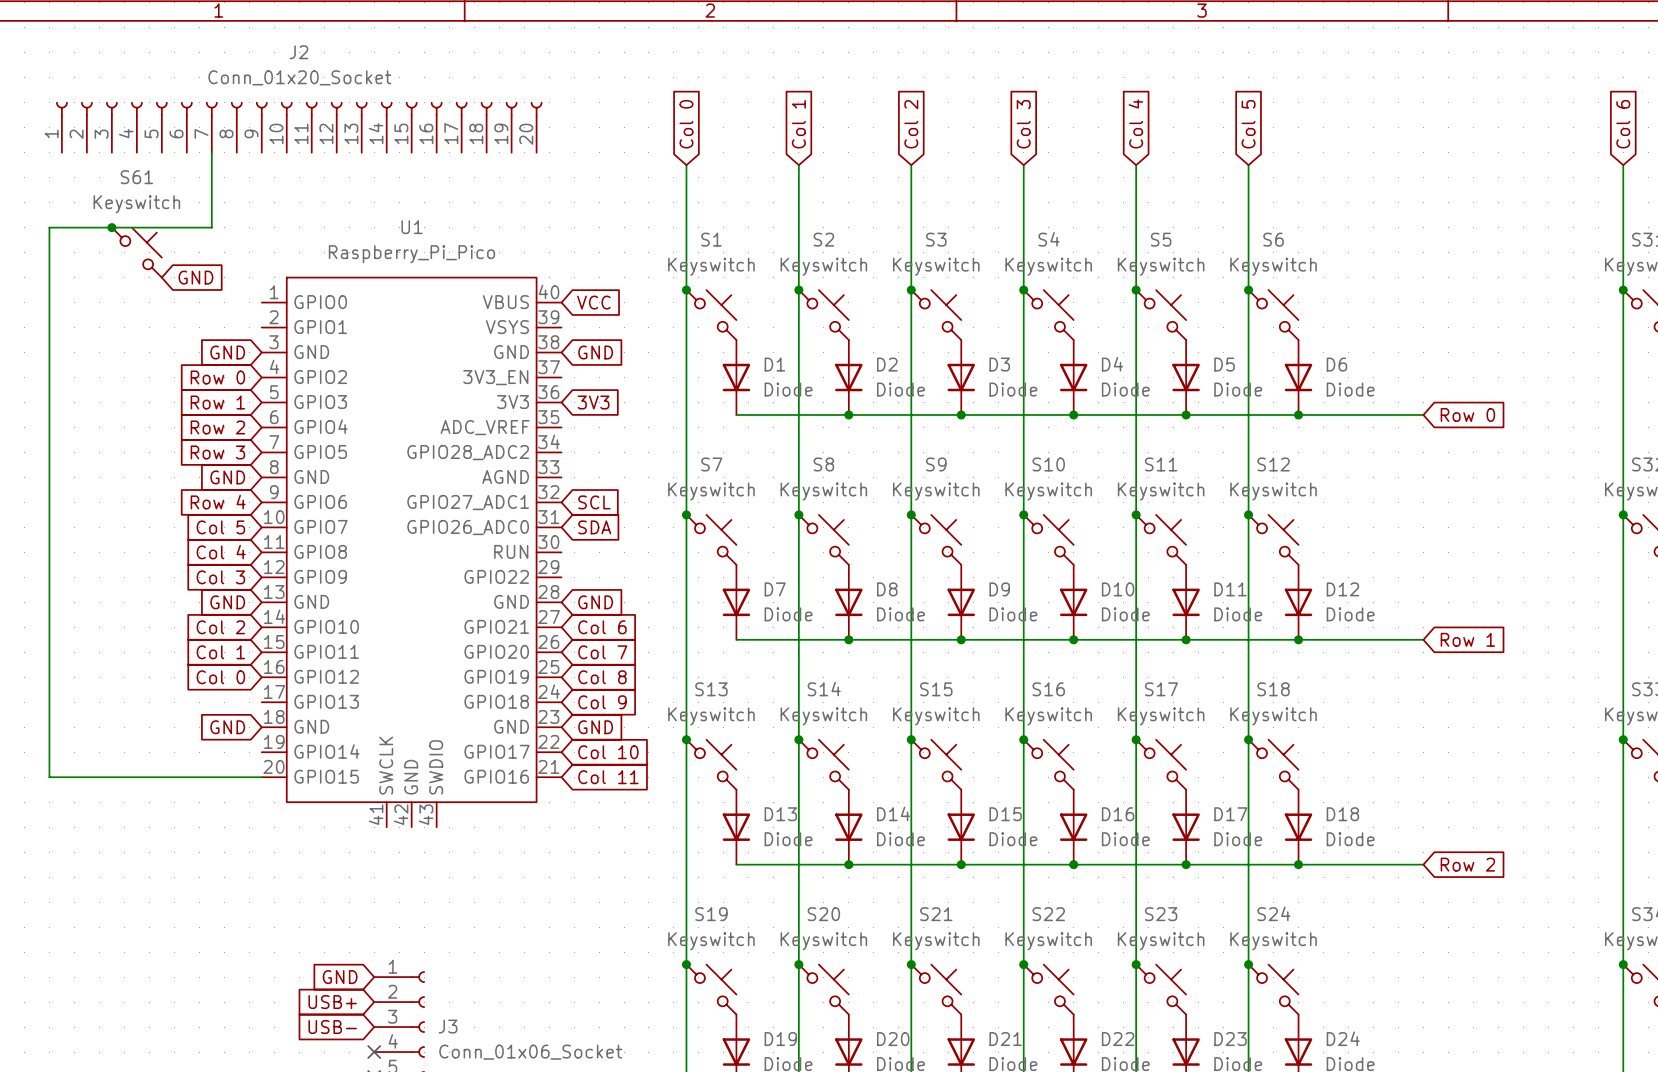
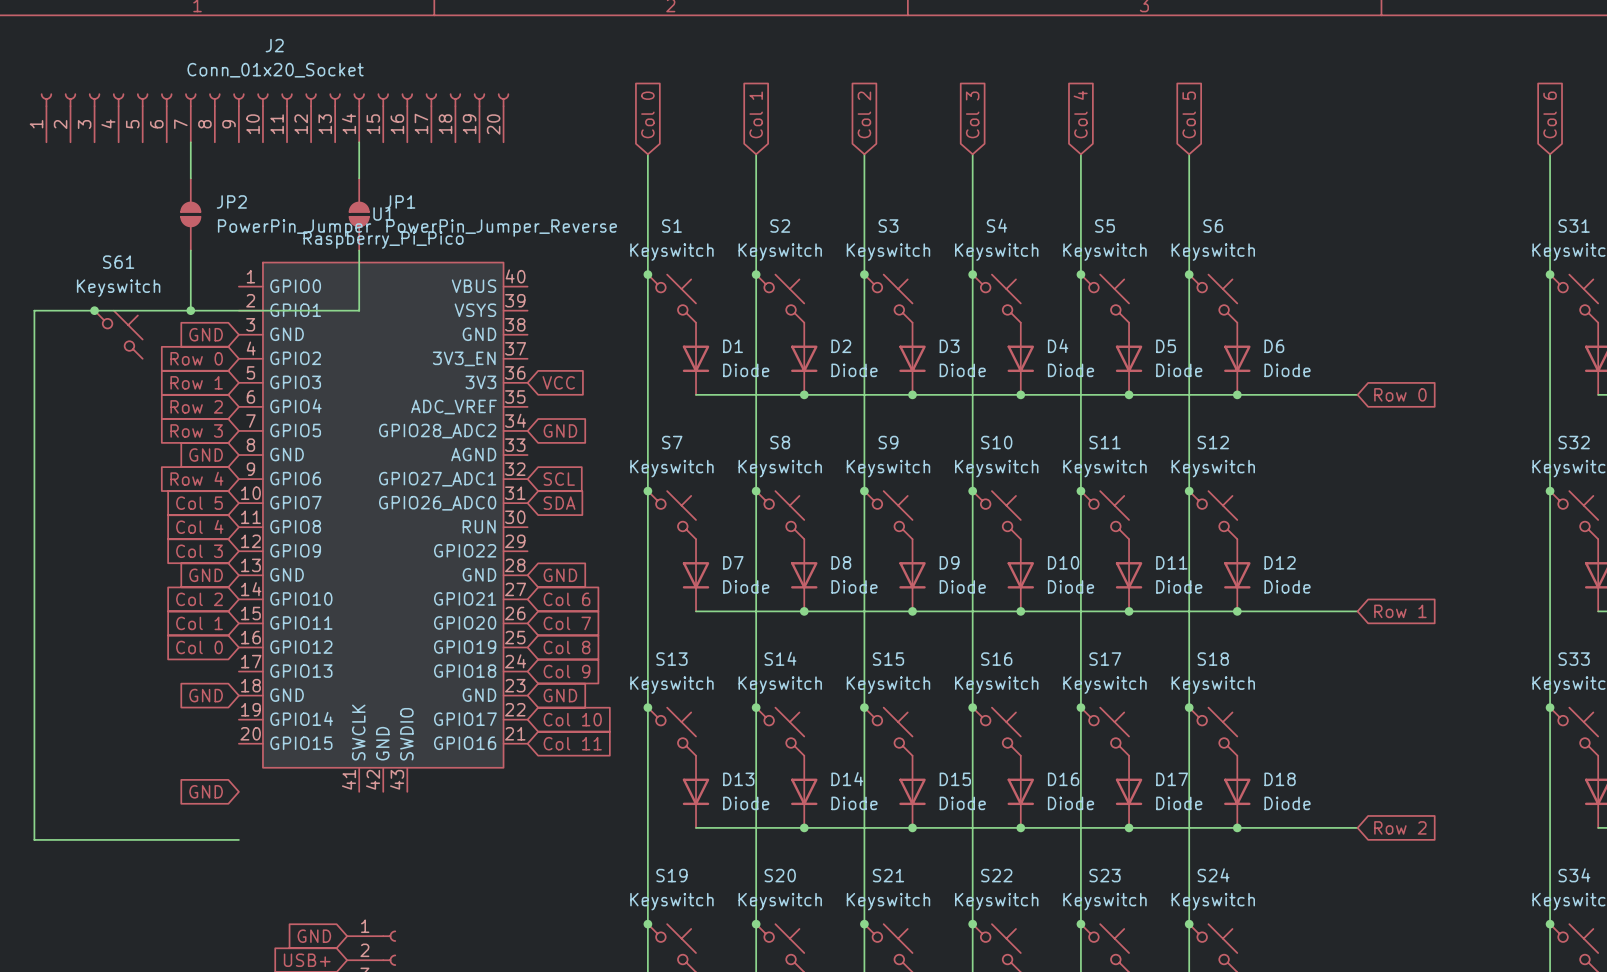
wire: none -> (359, 142) (359, 178)
wire: (211, 190) (211, 227) (49, 227) (49, 327) -> (359, 250) (359, 310) (34, 310)
junction: (111, 227) -> none
JP2: none -> PowerPin_Jumper (190, 214)
JP1: none -> PowerPin_Jumper_Reverse (359, 214)
S61 position: (136, 252) -> (118, 334)
wire: none -> (190, 250) (190, 310)
global label: GND (195, 277) -> none
global label: VCC (593, 302) -> none
junction: none -> (94, 310)
junction: none -> (190, 310)
global label position: GND (595, 352) -> GND (560, 430)
global label: 3V3 (593, 402) -> VCC (558, 382)
wire: (49, 777) (261, 777) -> (34, 743) (34, 839) (238, 839)
global label: none -> GND (206, 791)

